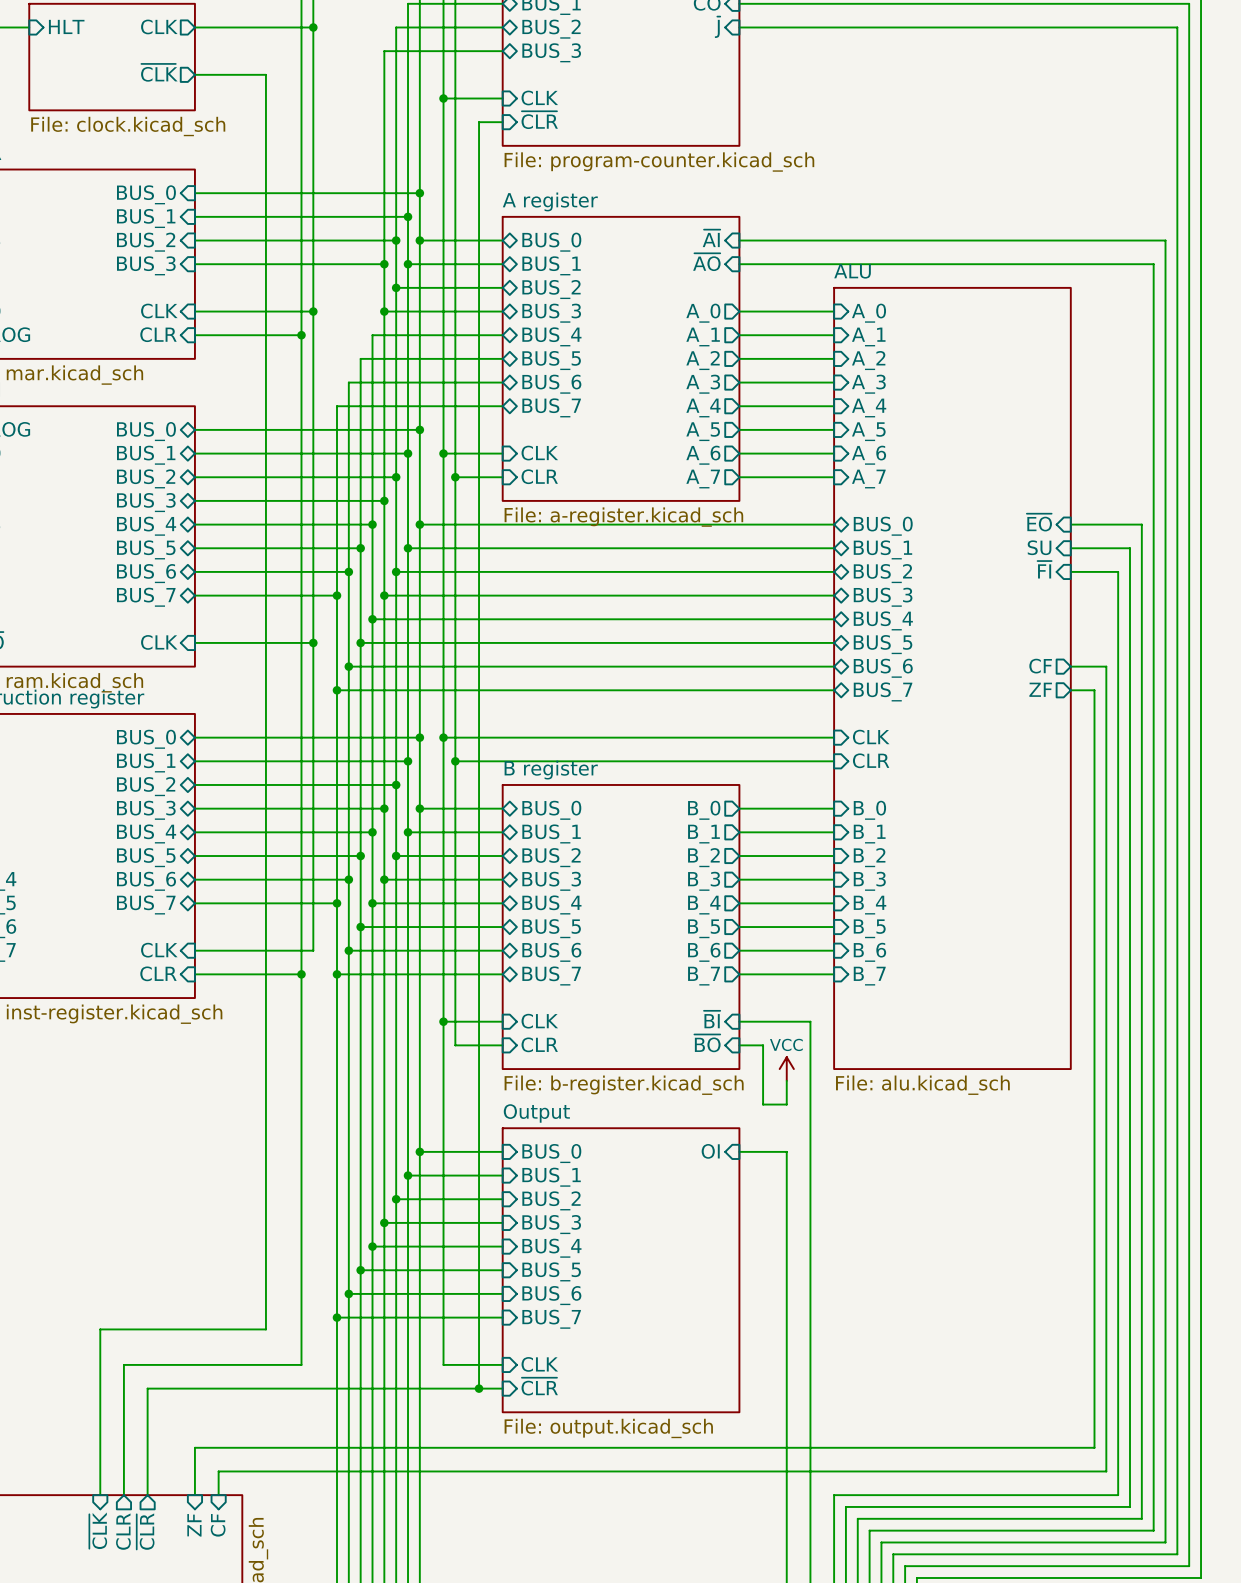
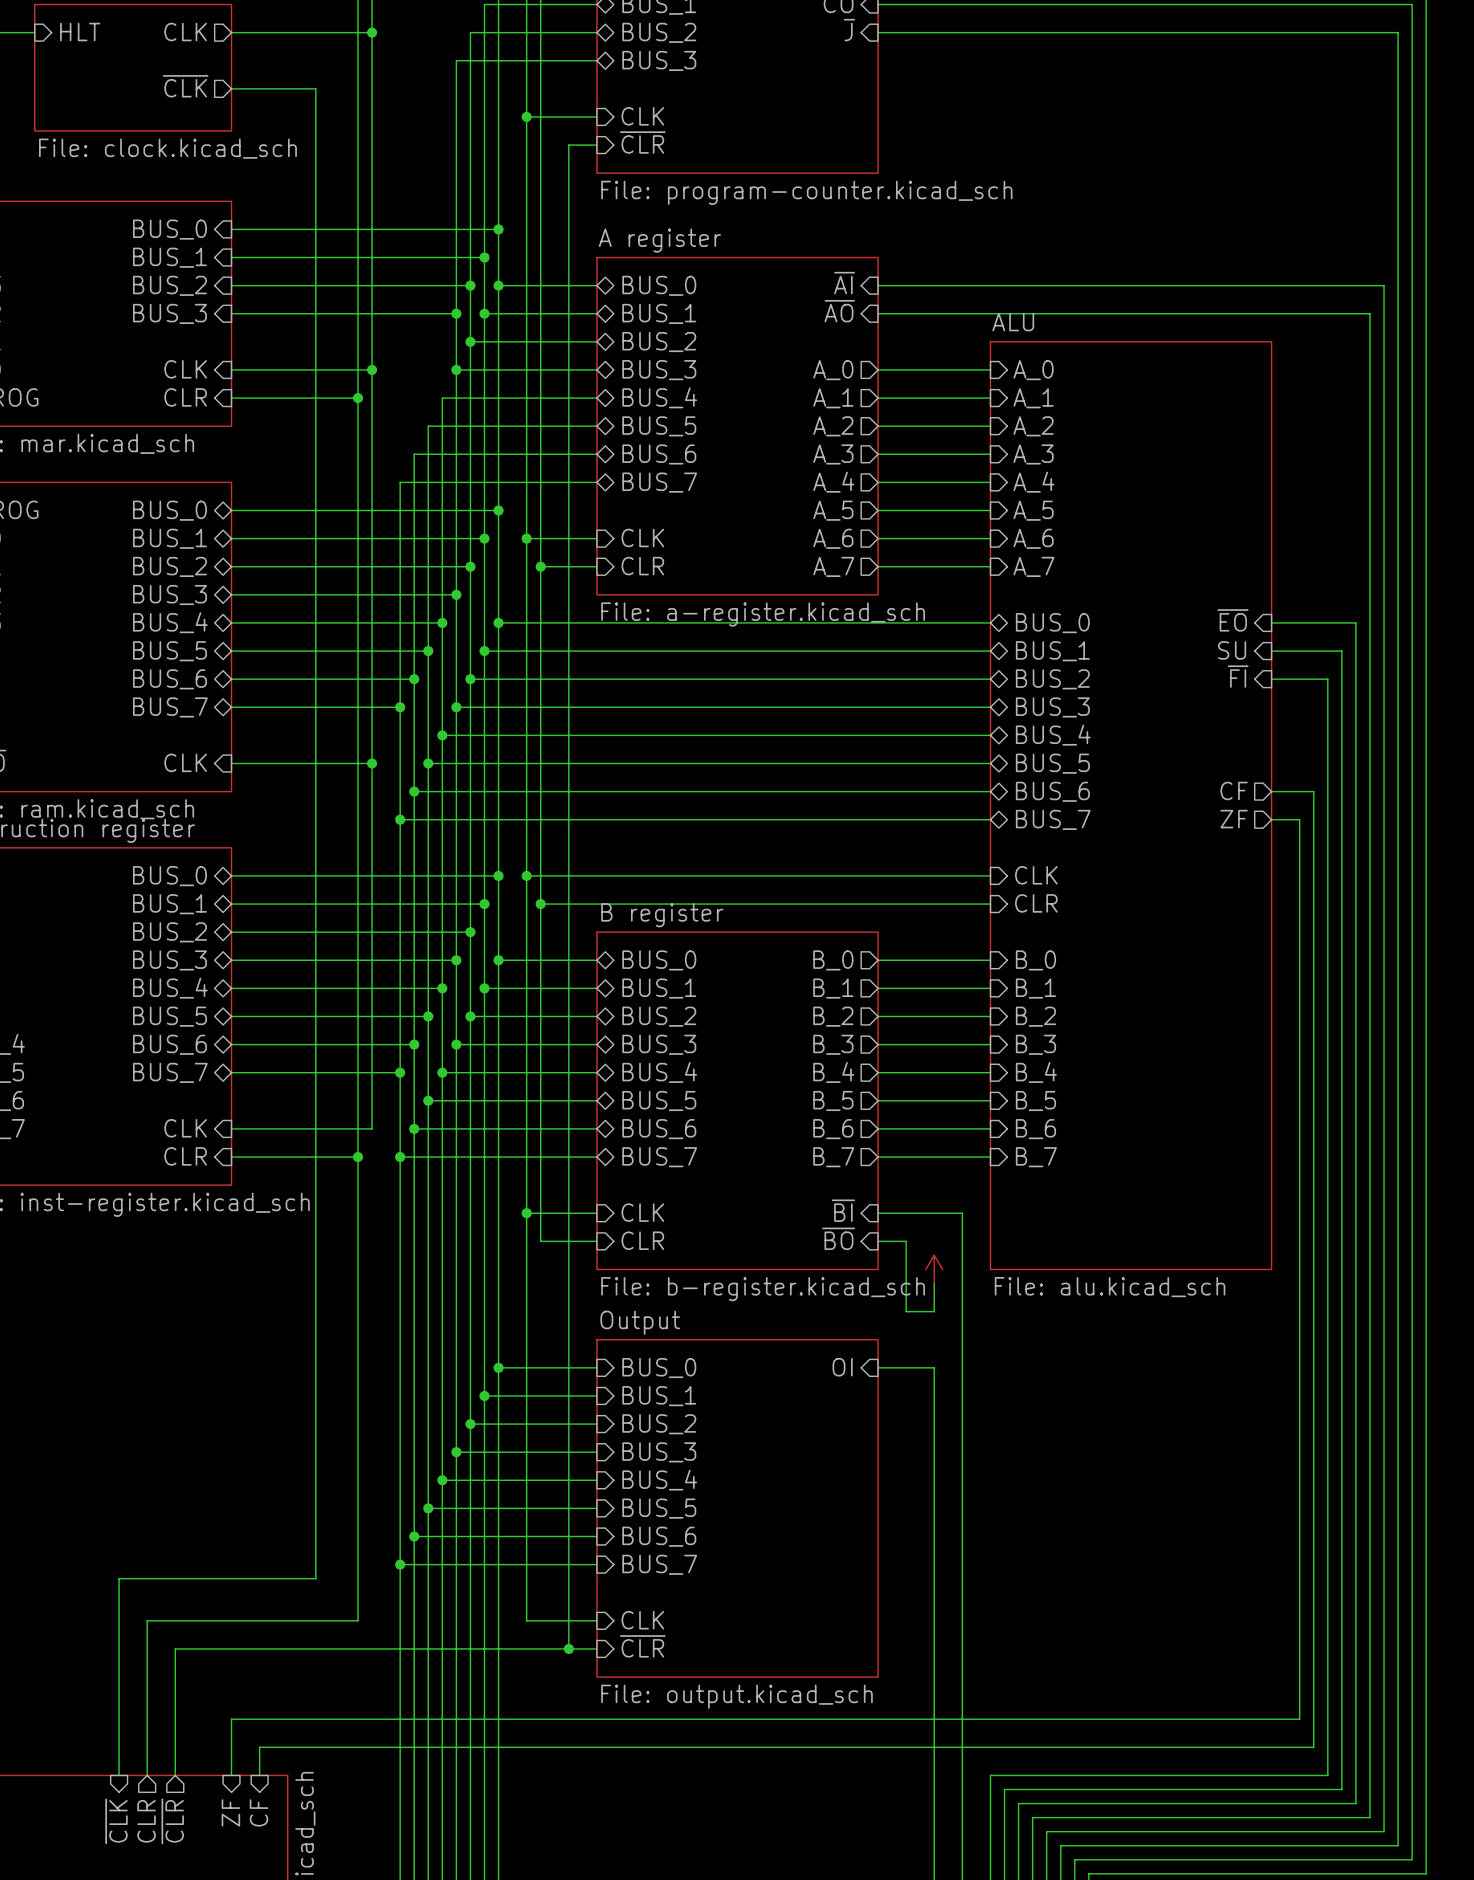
power symbol text: VCC (786, 1044) -> none

